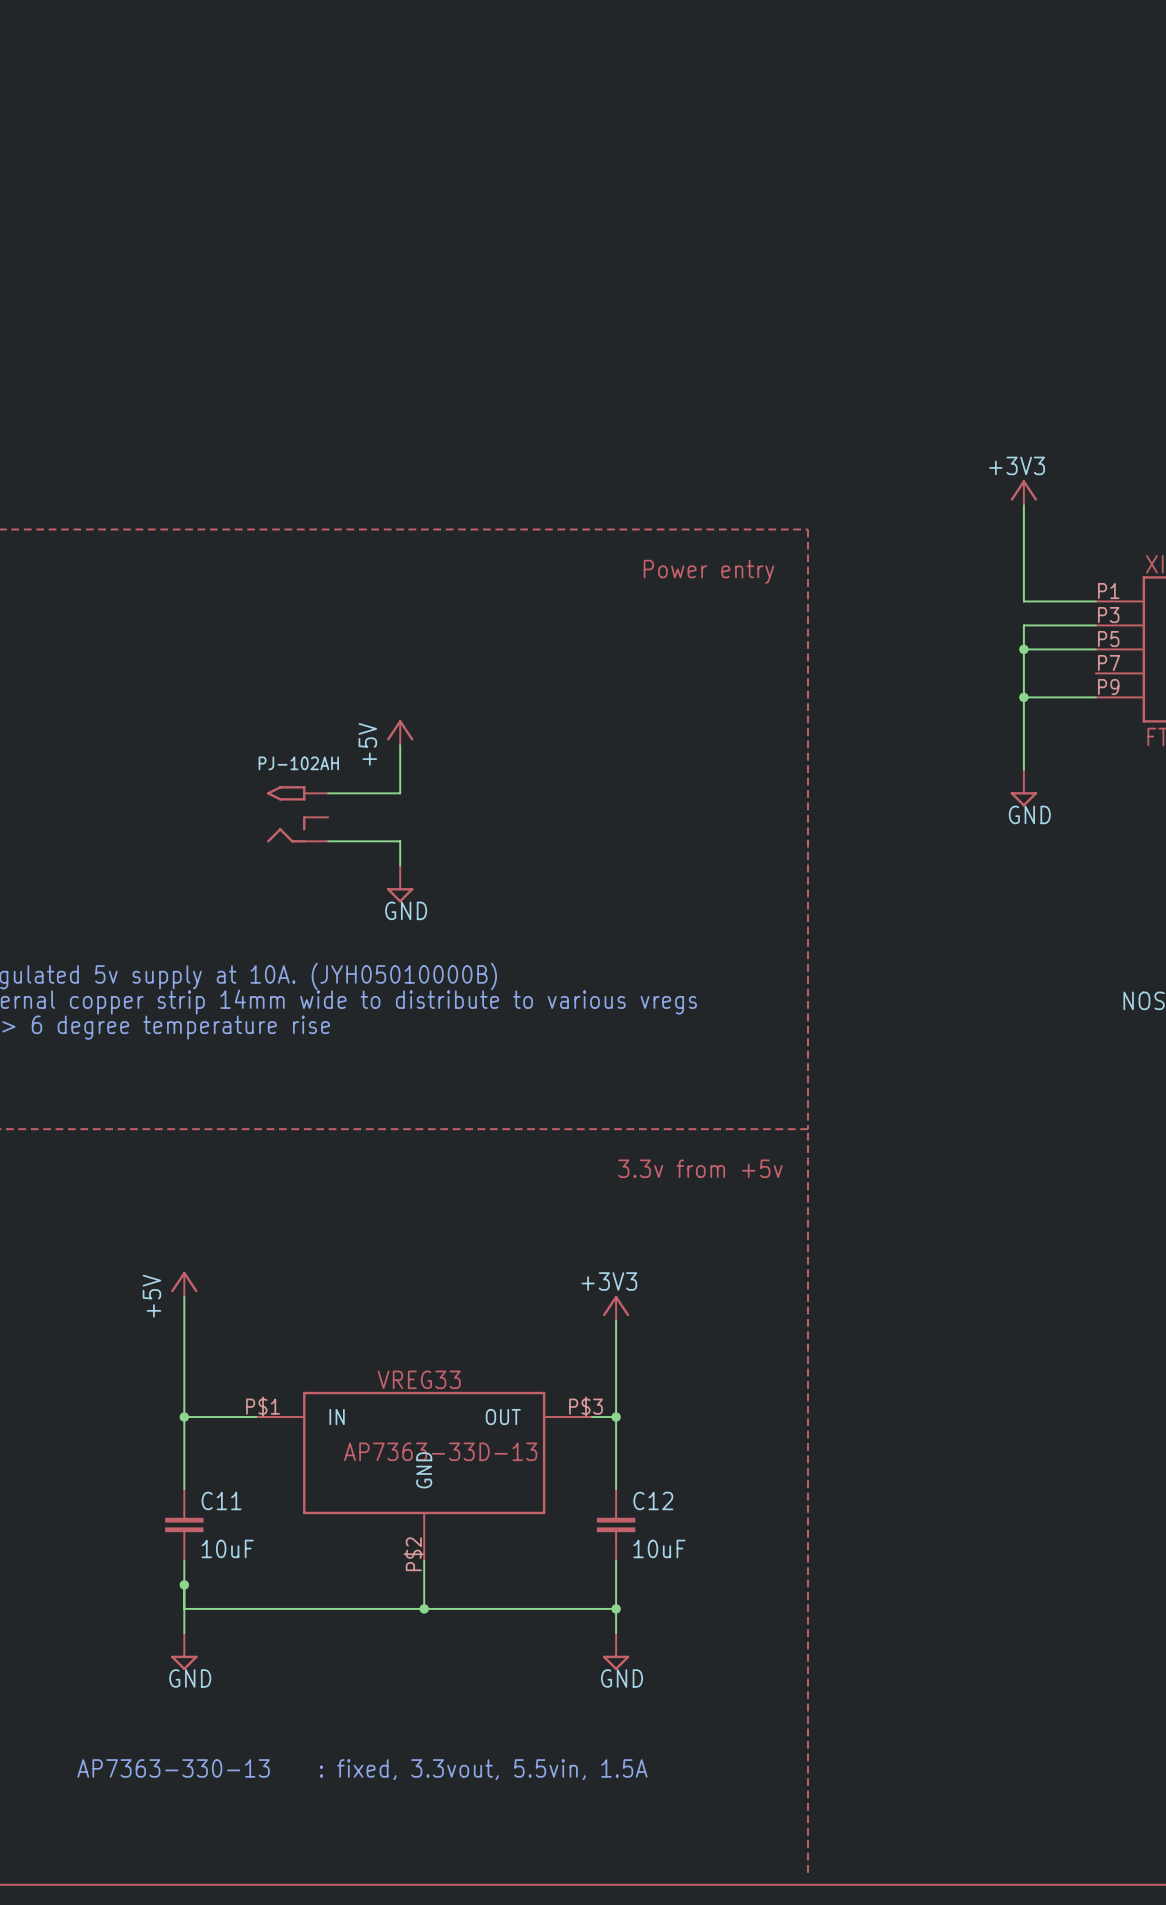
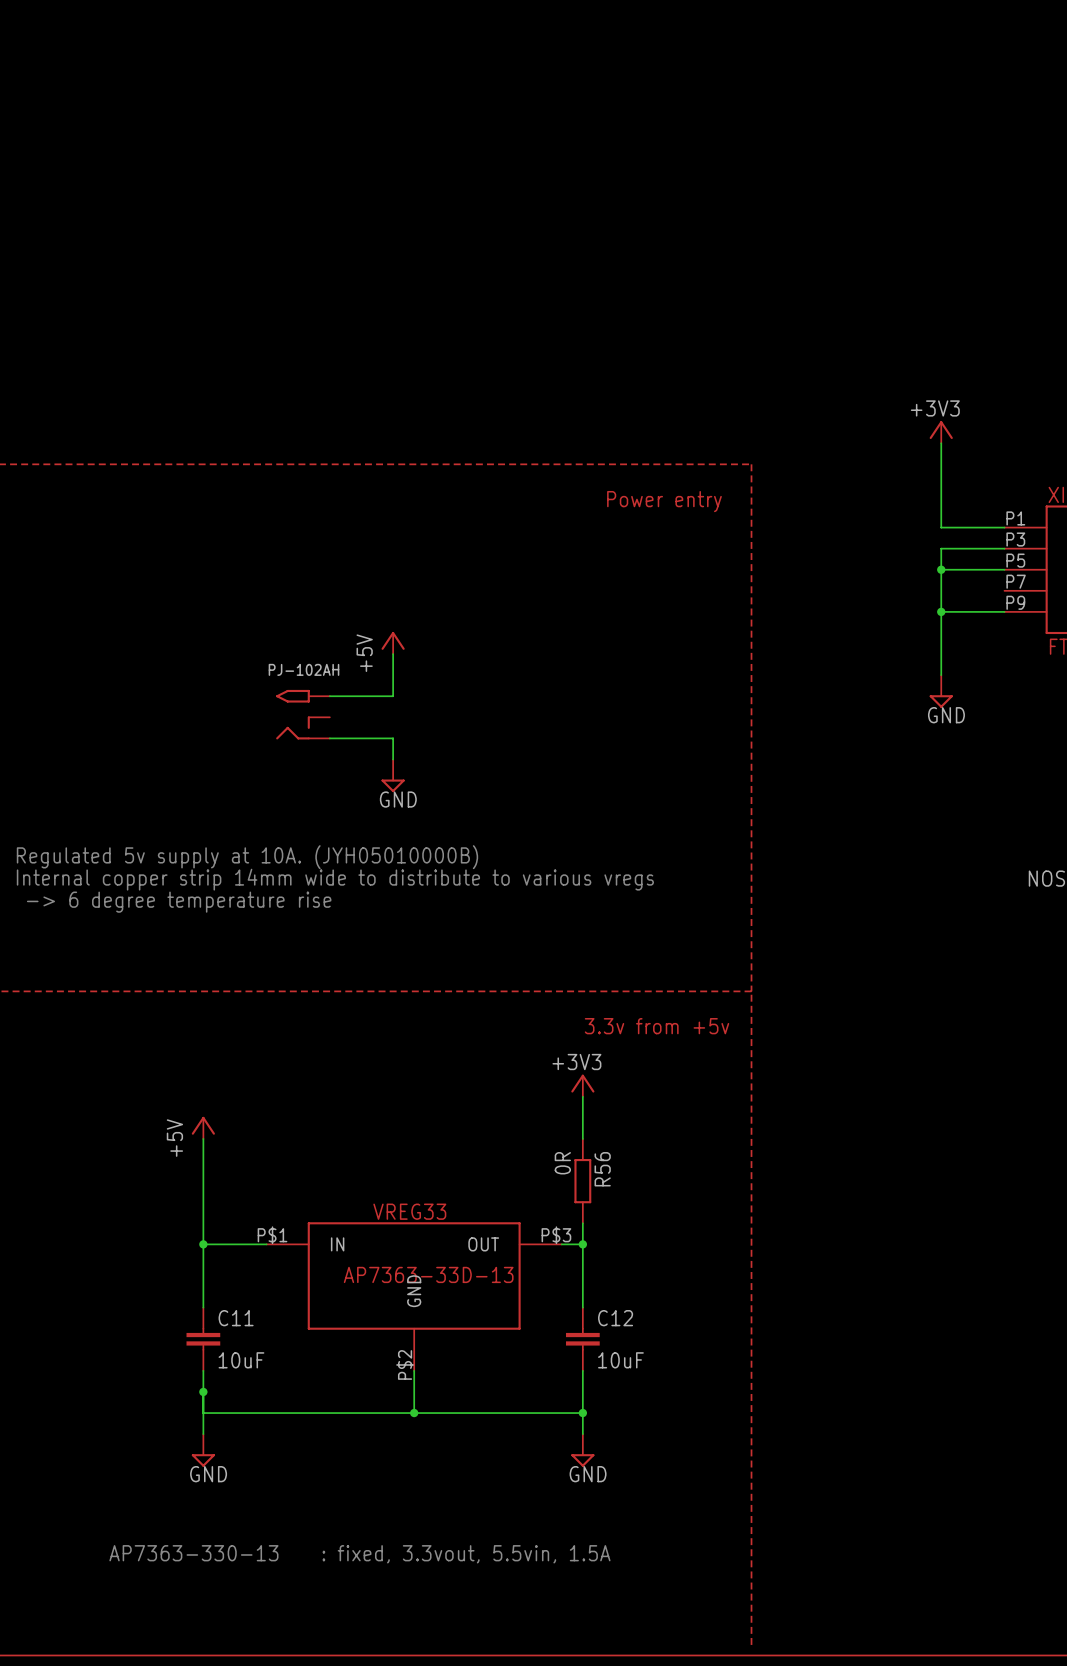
wire: none -> (582, 1096) (582, 1138)
power symbol position: +3V3 (616, 1308) -> +3V3 (582, 1085)
wire: (616, 1321) (616, 1393) -> none
R56: none -> 0R (582, 1181)

